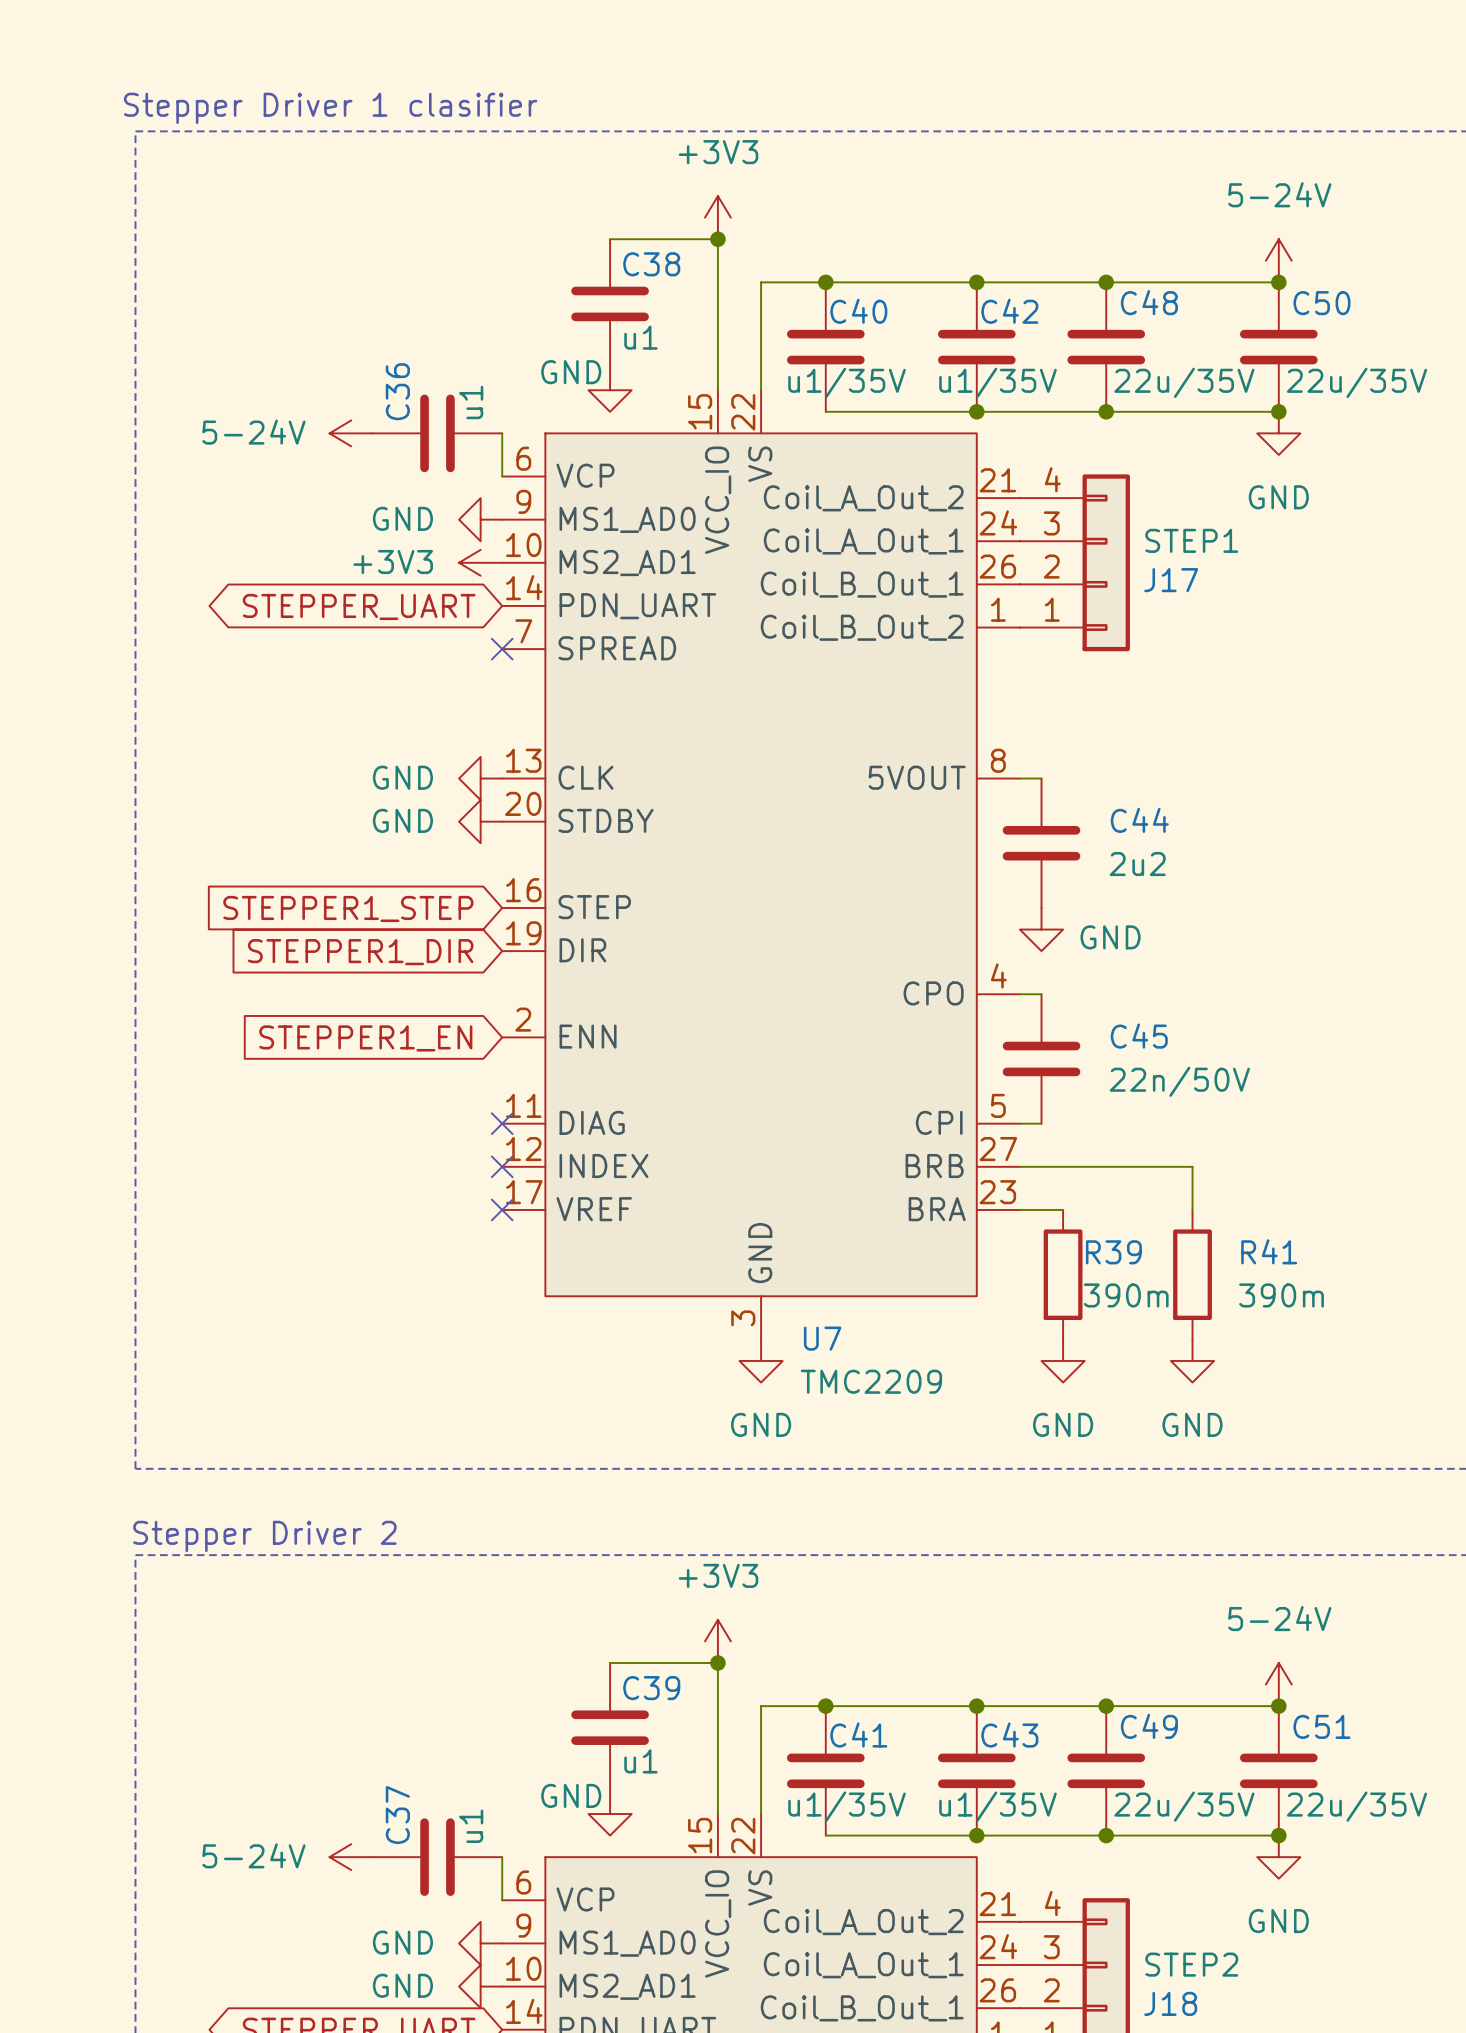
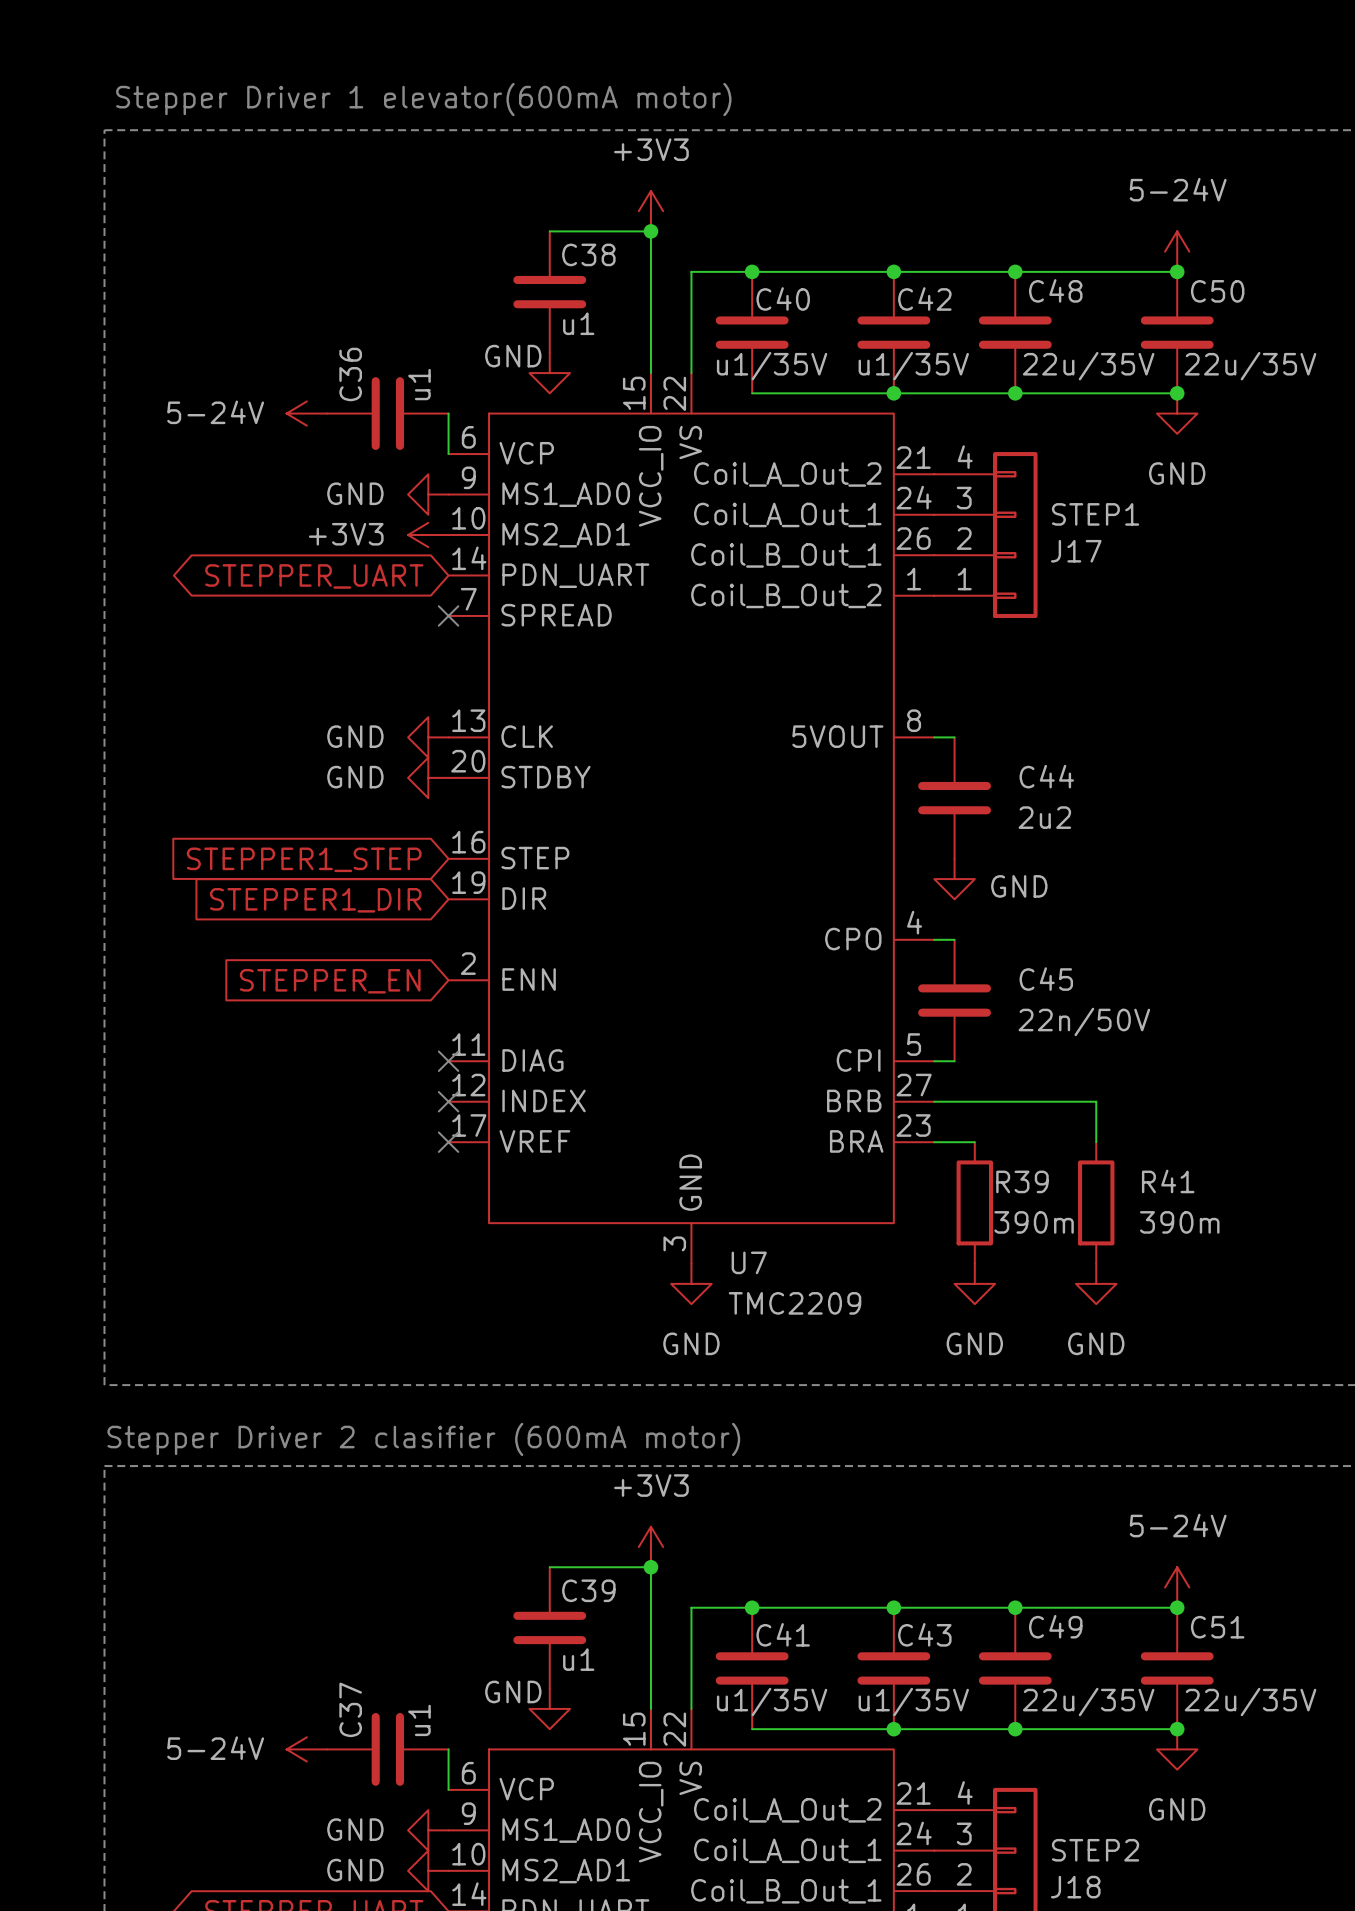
text: Stepper Driver 1 clasifier (330, 108) -> Stepper Driver 1 elevator(600mA motor) (423, 99)
global label: STEPPER1_EN (365, 1038) -> STEPPER_EN (330, 981)
text: none -> Stepper Driver 2 clasifier (600mA motor) (423, 1439)
text: Stepper Driver 2 (264, 1536) -> none

